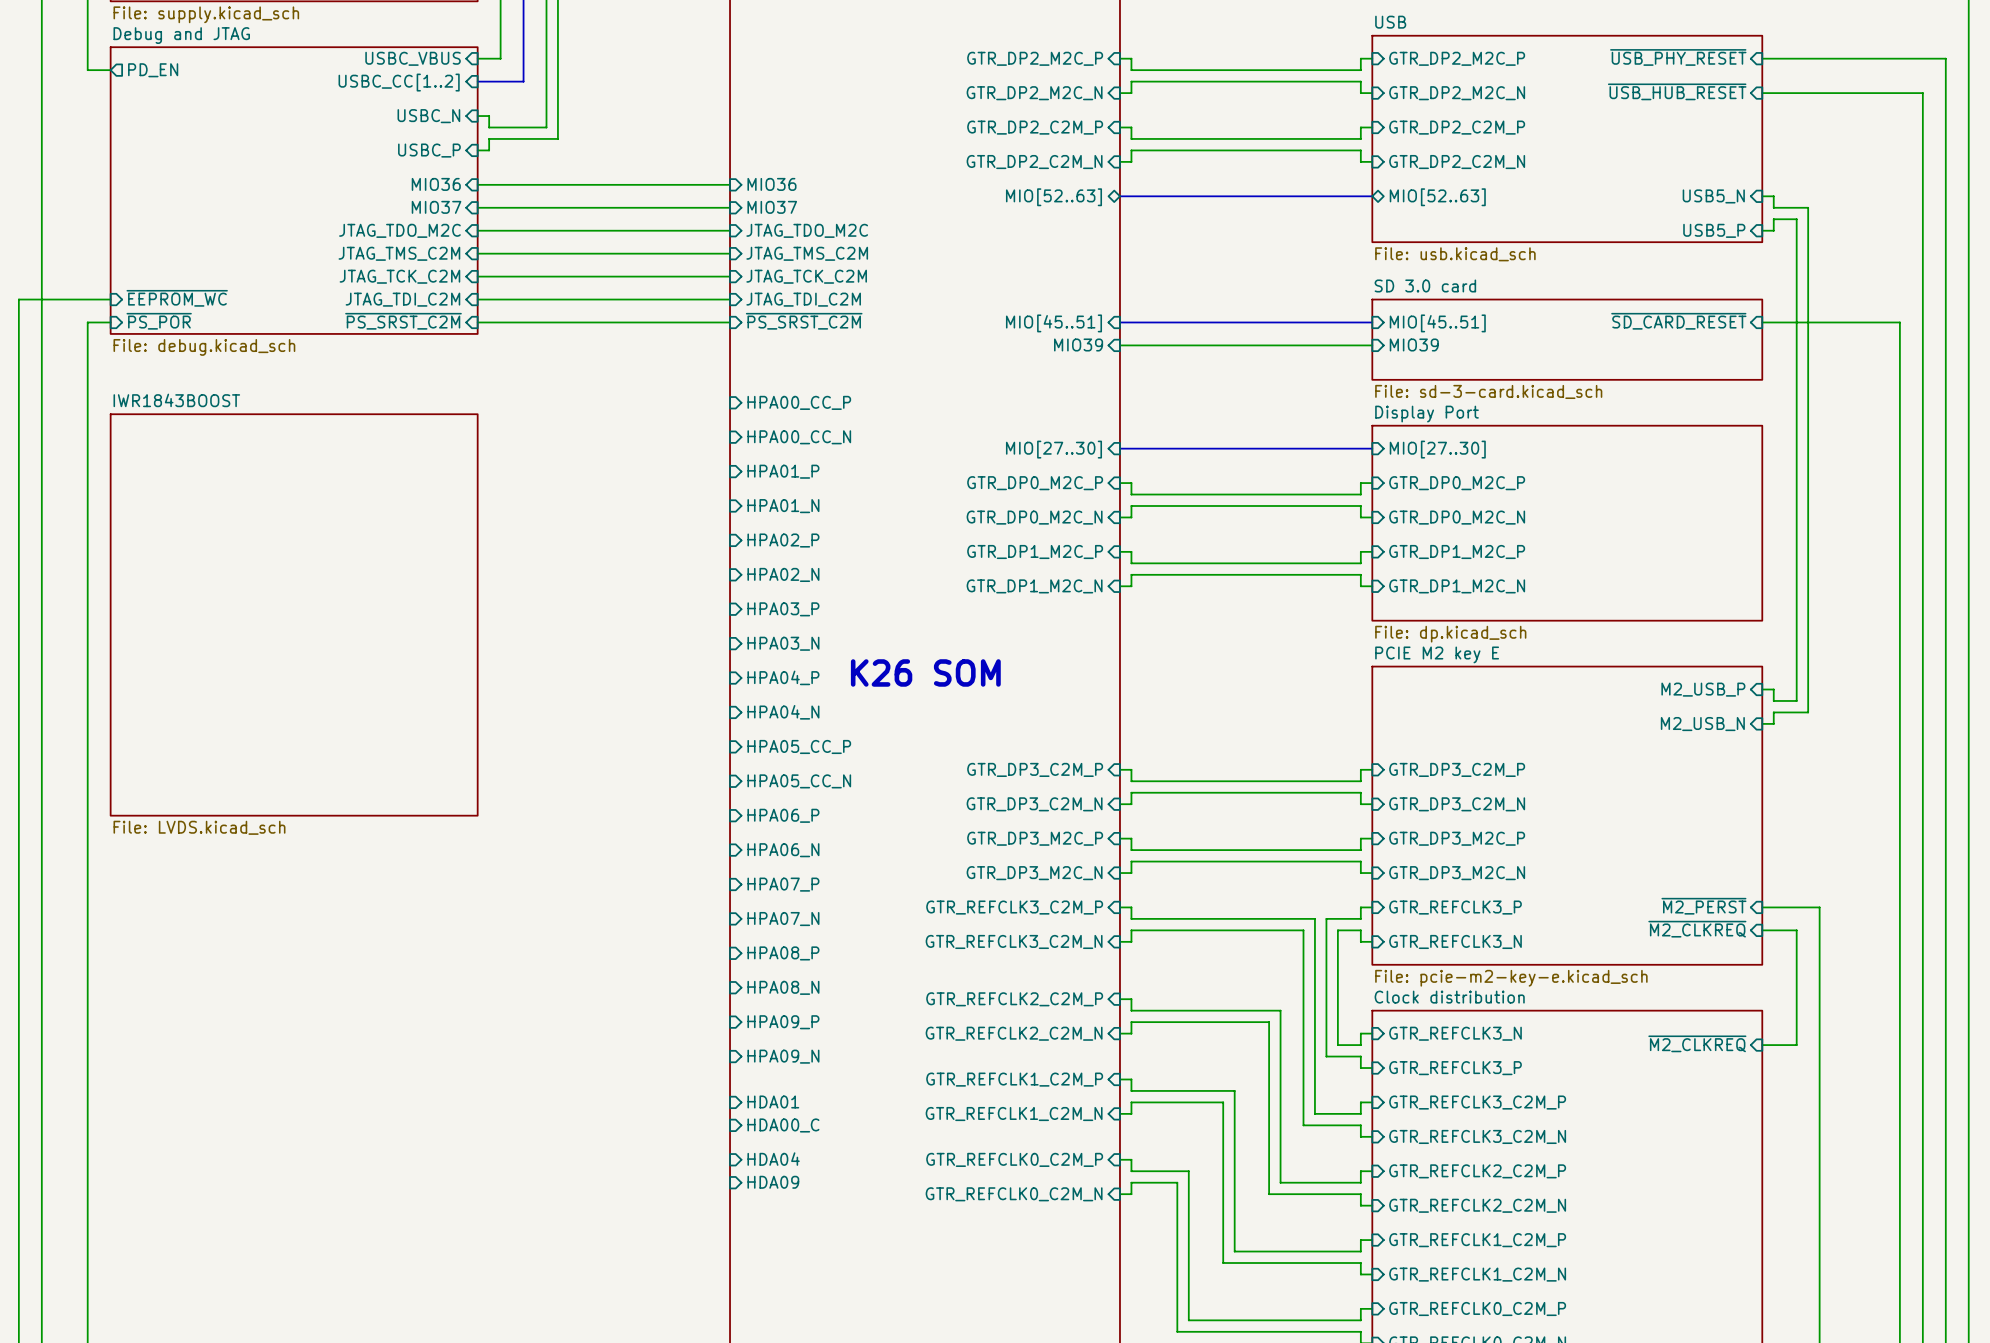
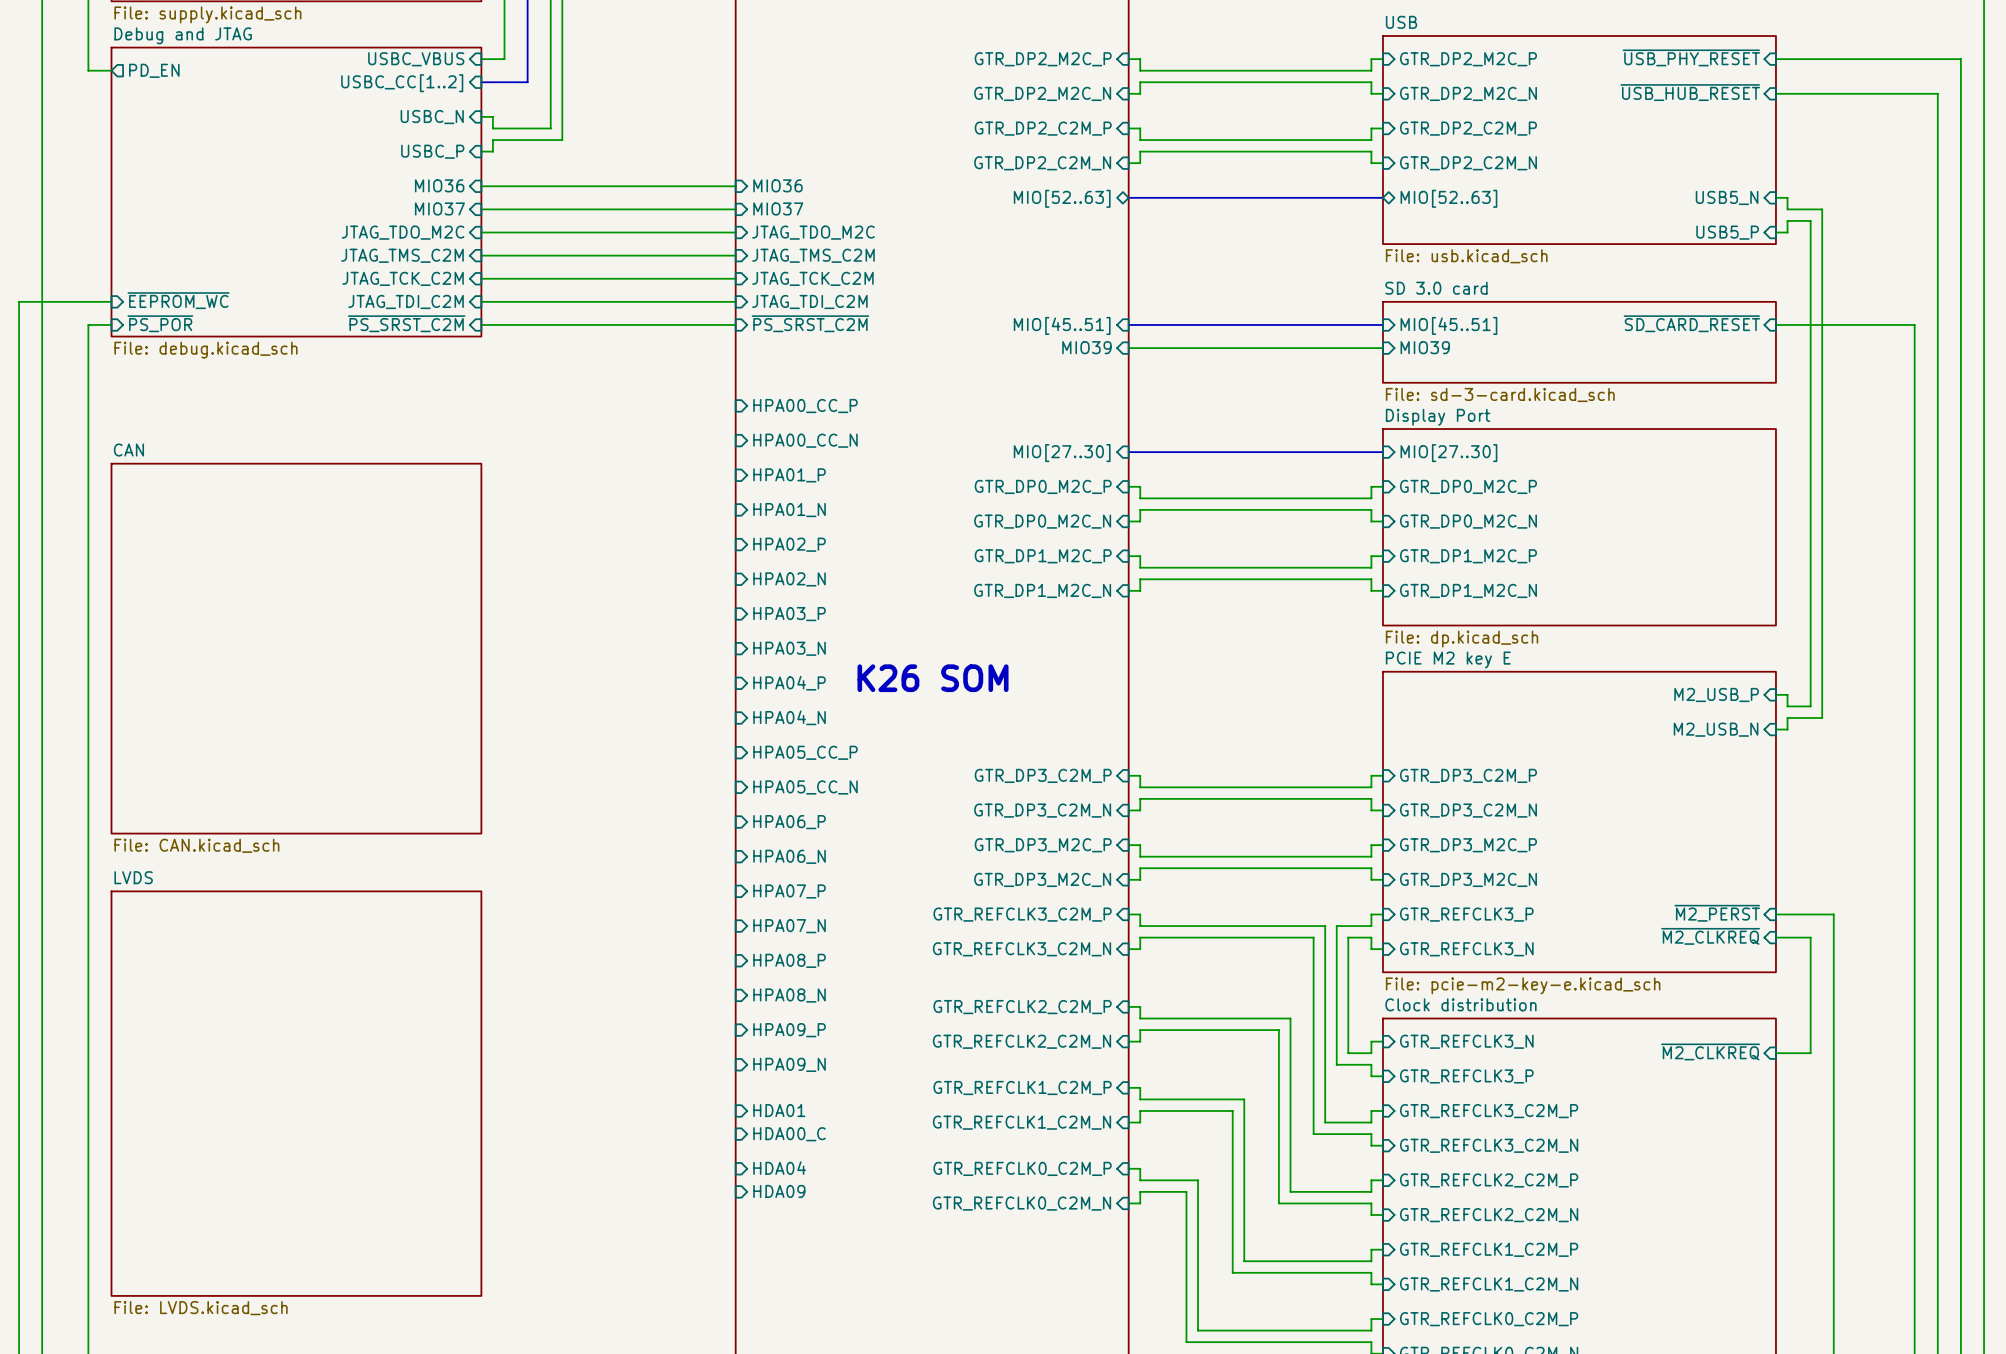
sheet IWR1843BOOST: File: LVDS.kicad_sch (294, 614) -> none
sheet CAN: none -> File: CAN.kicad_sch (296, 648)
sheet LVDS: none -> File: LVDS.kicad_sch (296, 1093)

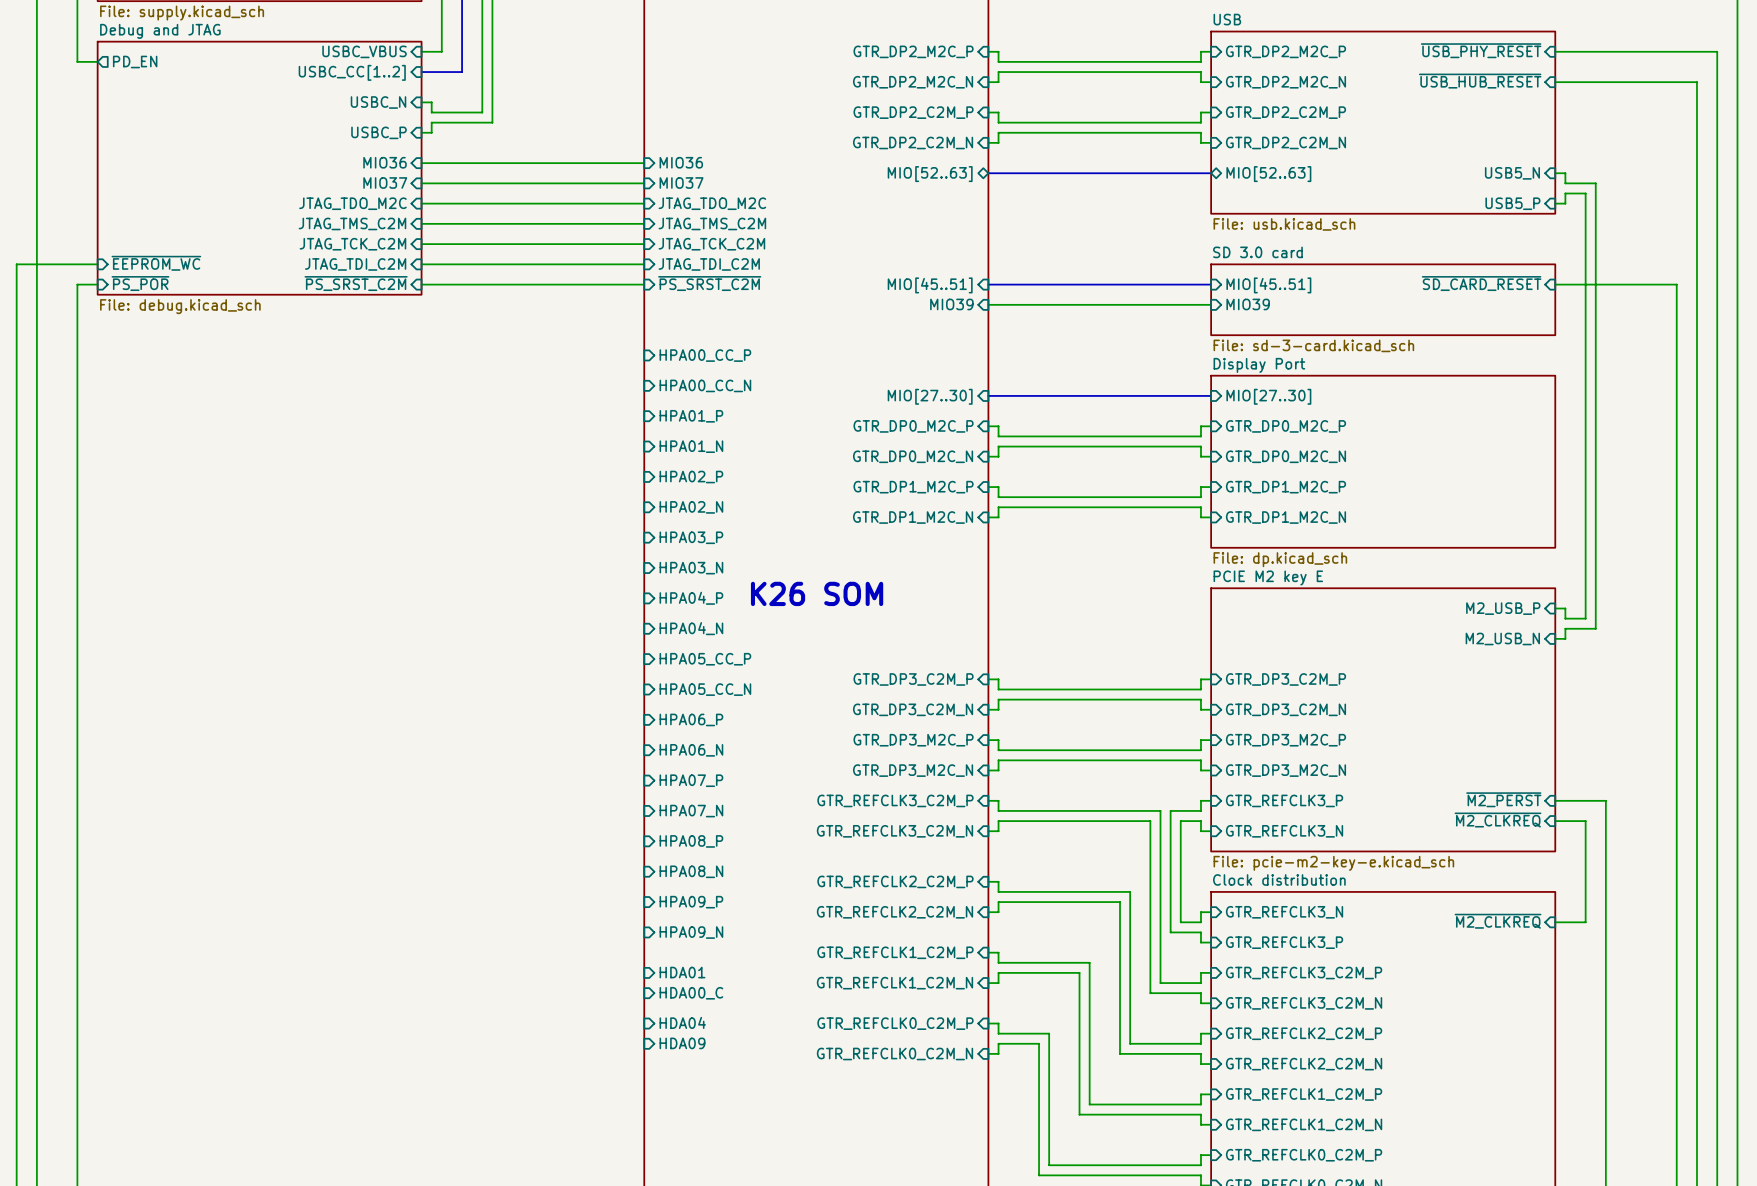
sheet CAN: File: CAN.kicad_sch (296, 648) -> none
sheet LVDS: File: LVDS.kicad_sch (296, 1093) -> none

